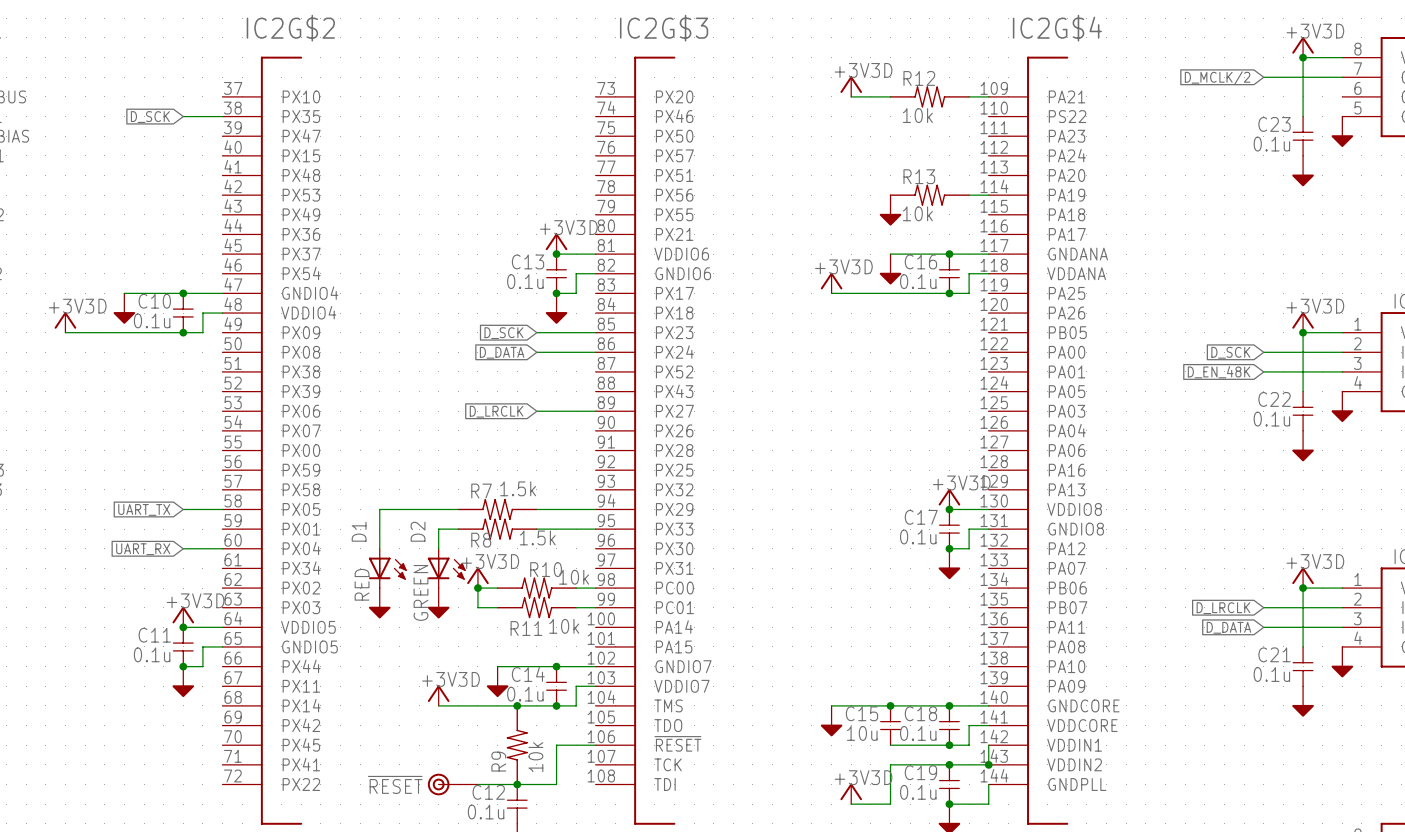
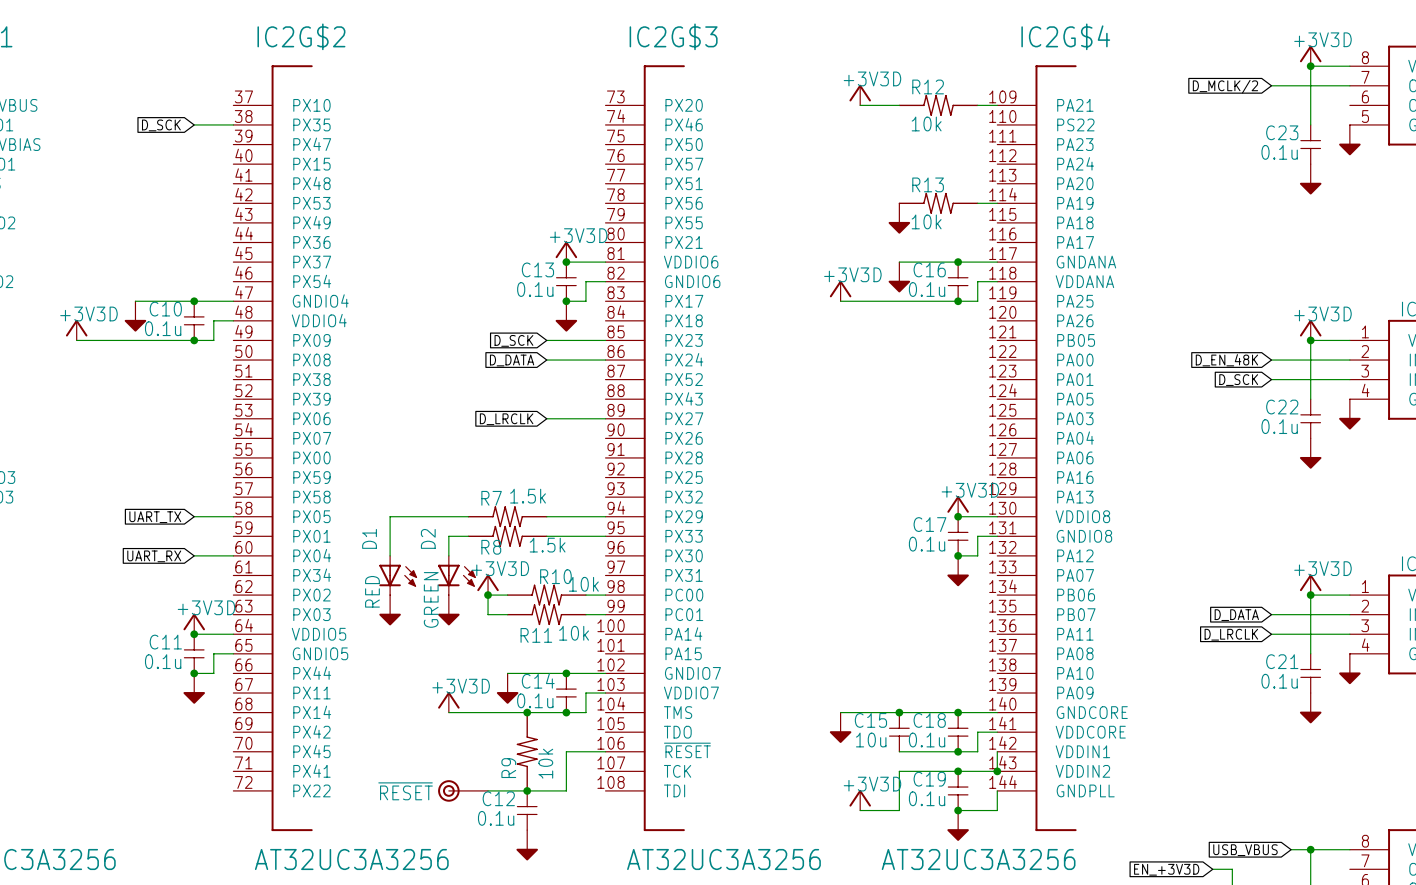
global label: D_SCK (1230, 352) -> D_EN_48K (1226, 360)
global label: D_EN_48K (1219, 372) -> D_SCK (1238, 380)
global label: D_LRCLK (1223, 608) -> D_DATA (1236, 615)
global label: D_DATA (1228, 627) -> D_LRCLK (1231, 634)

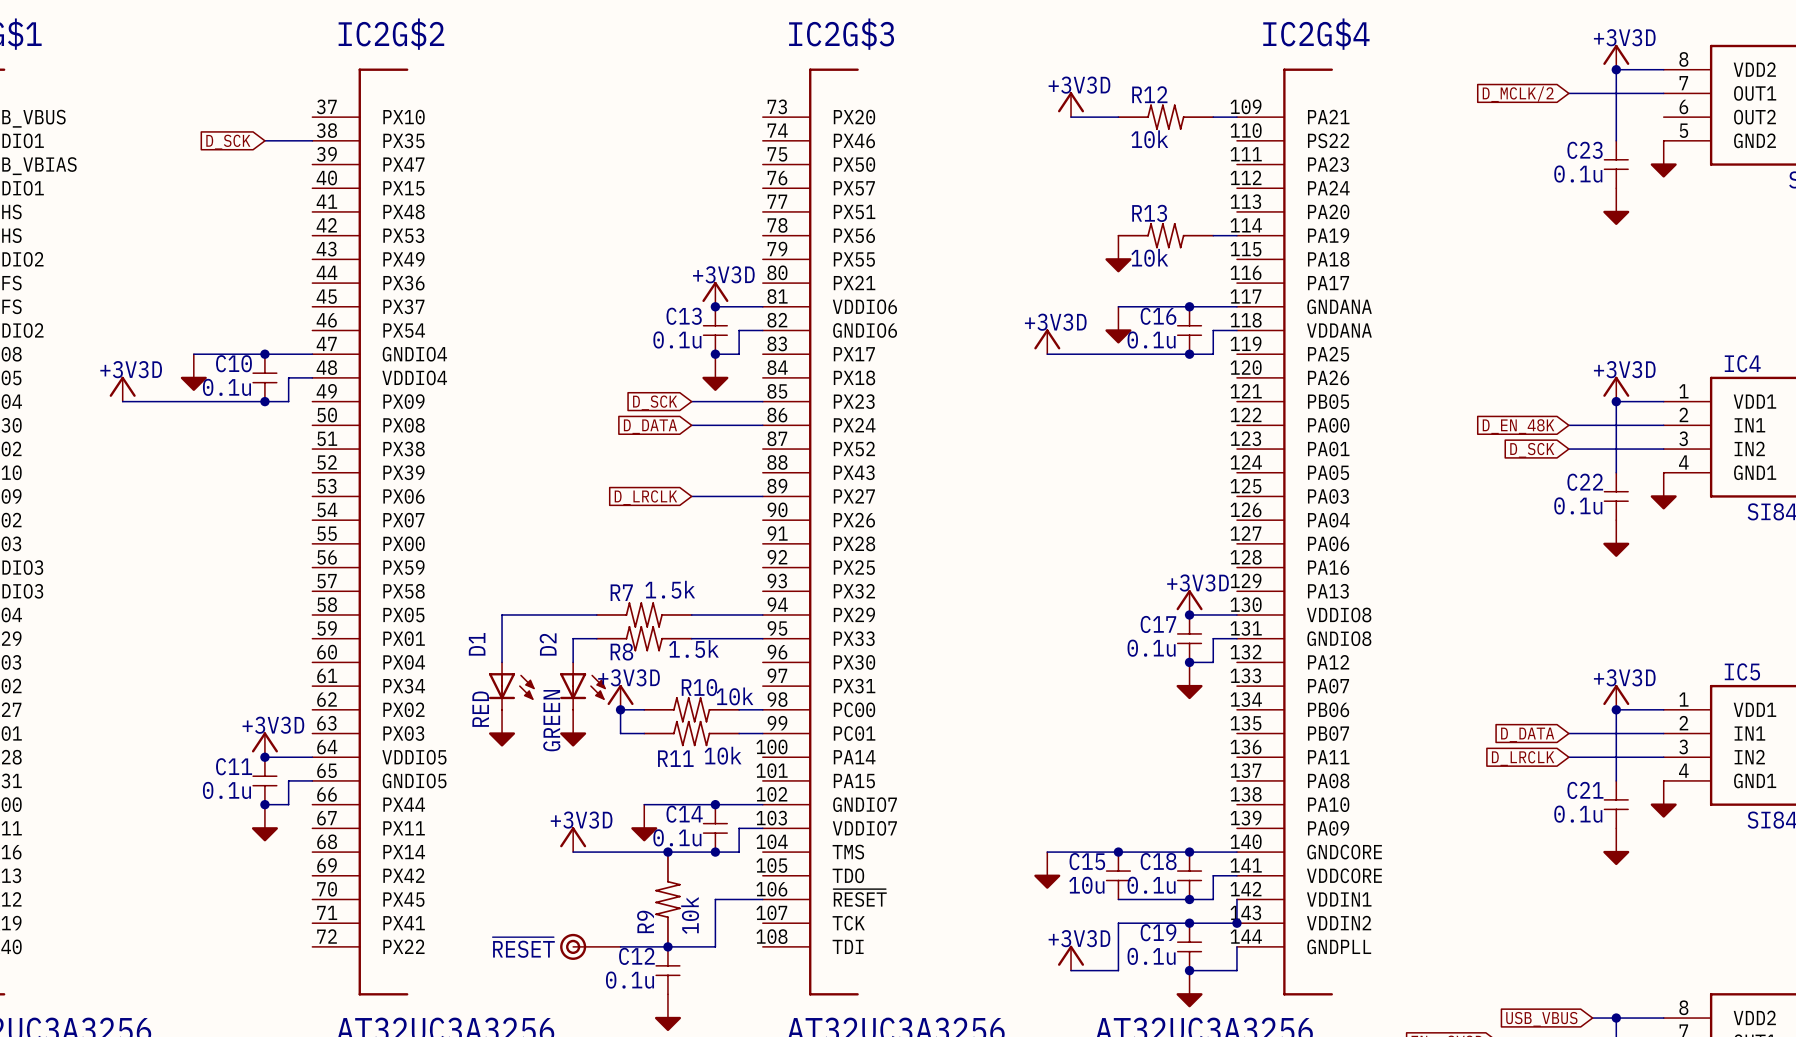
wire: (194, 516) (233, 516) -> none
global label: UART_TX (155, 517) -> none
wire: (194, 555) (233, 555) -> none
global label: UART_RX (154, 556) -> none

